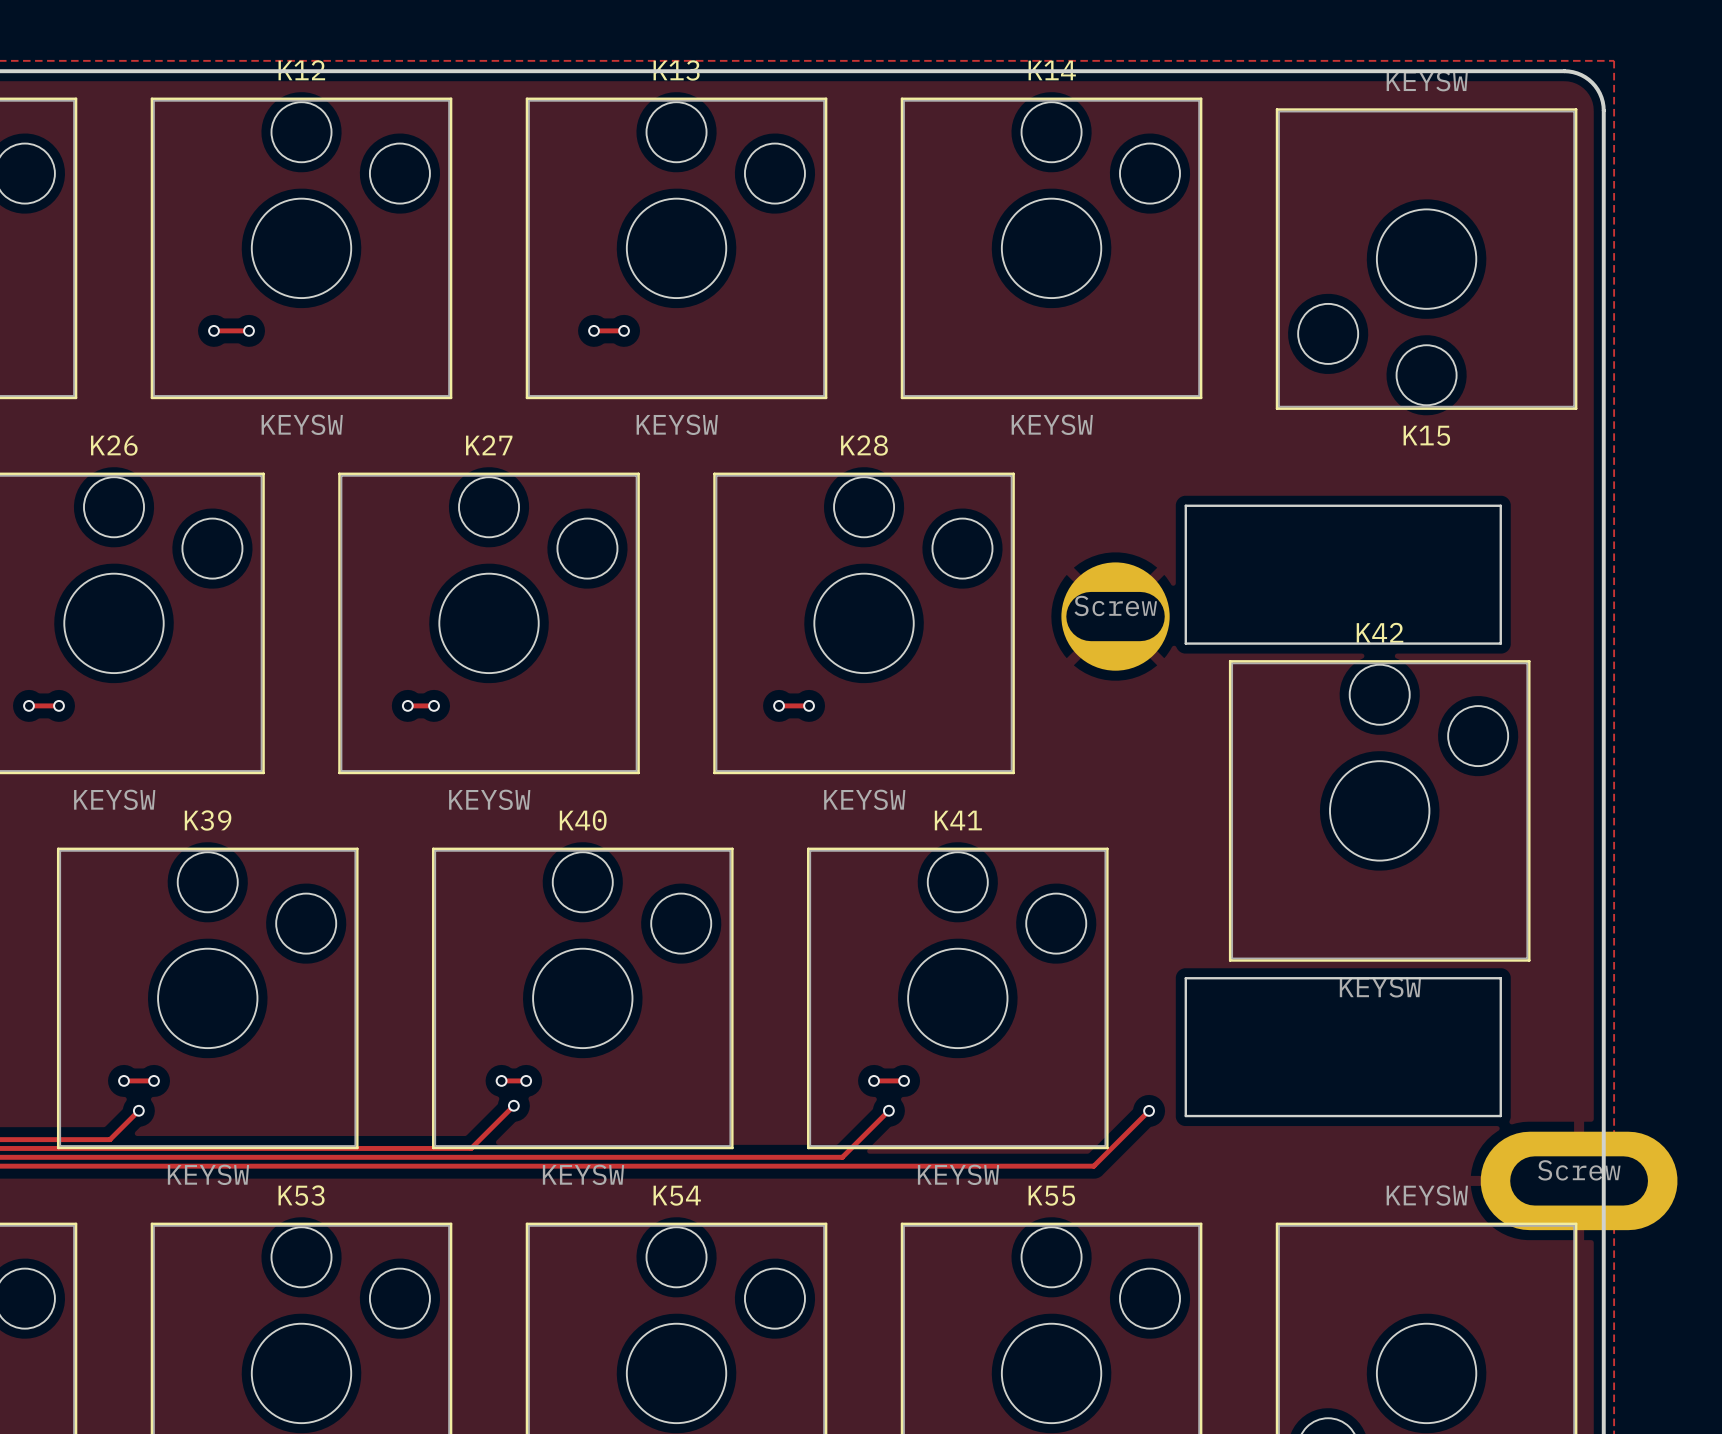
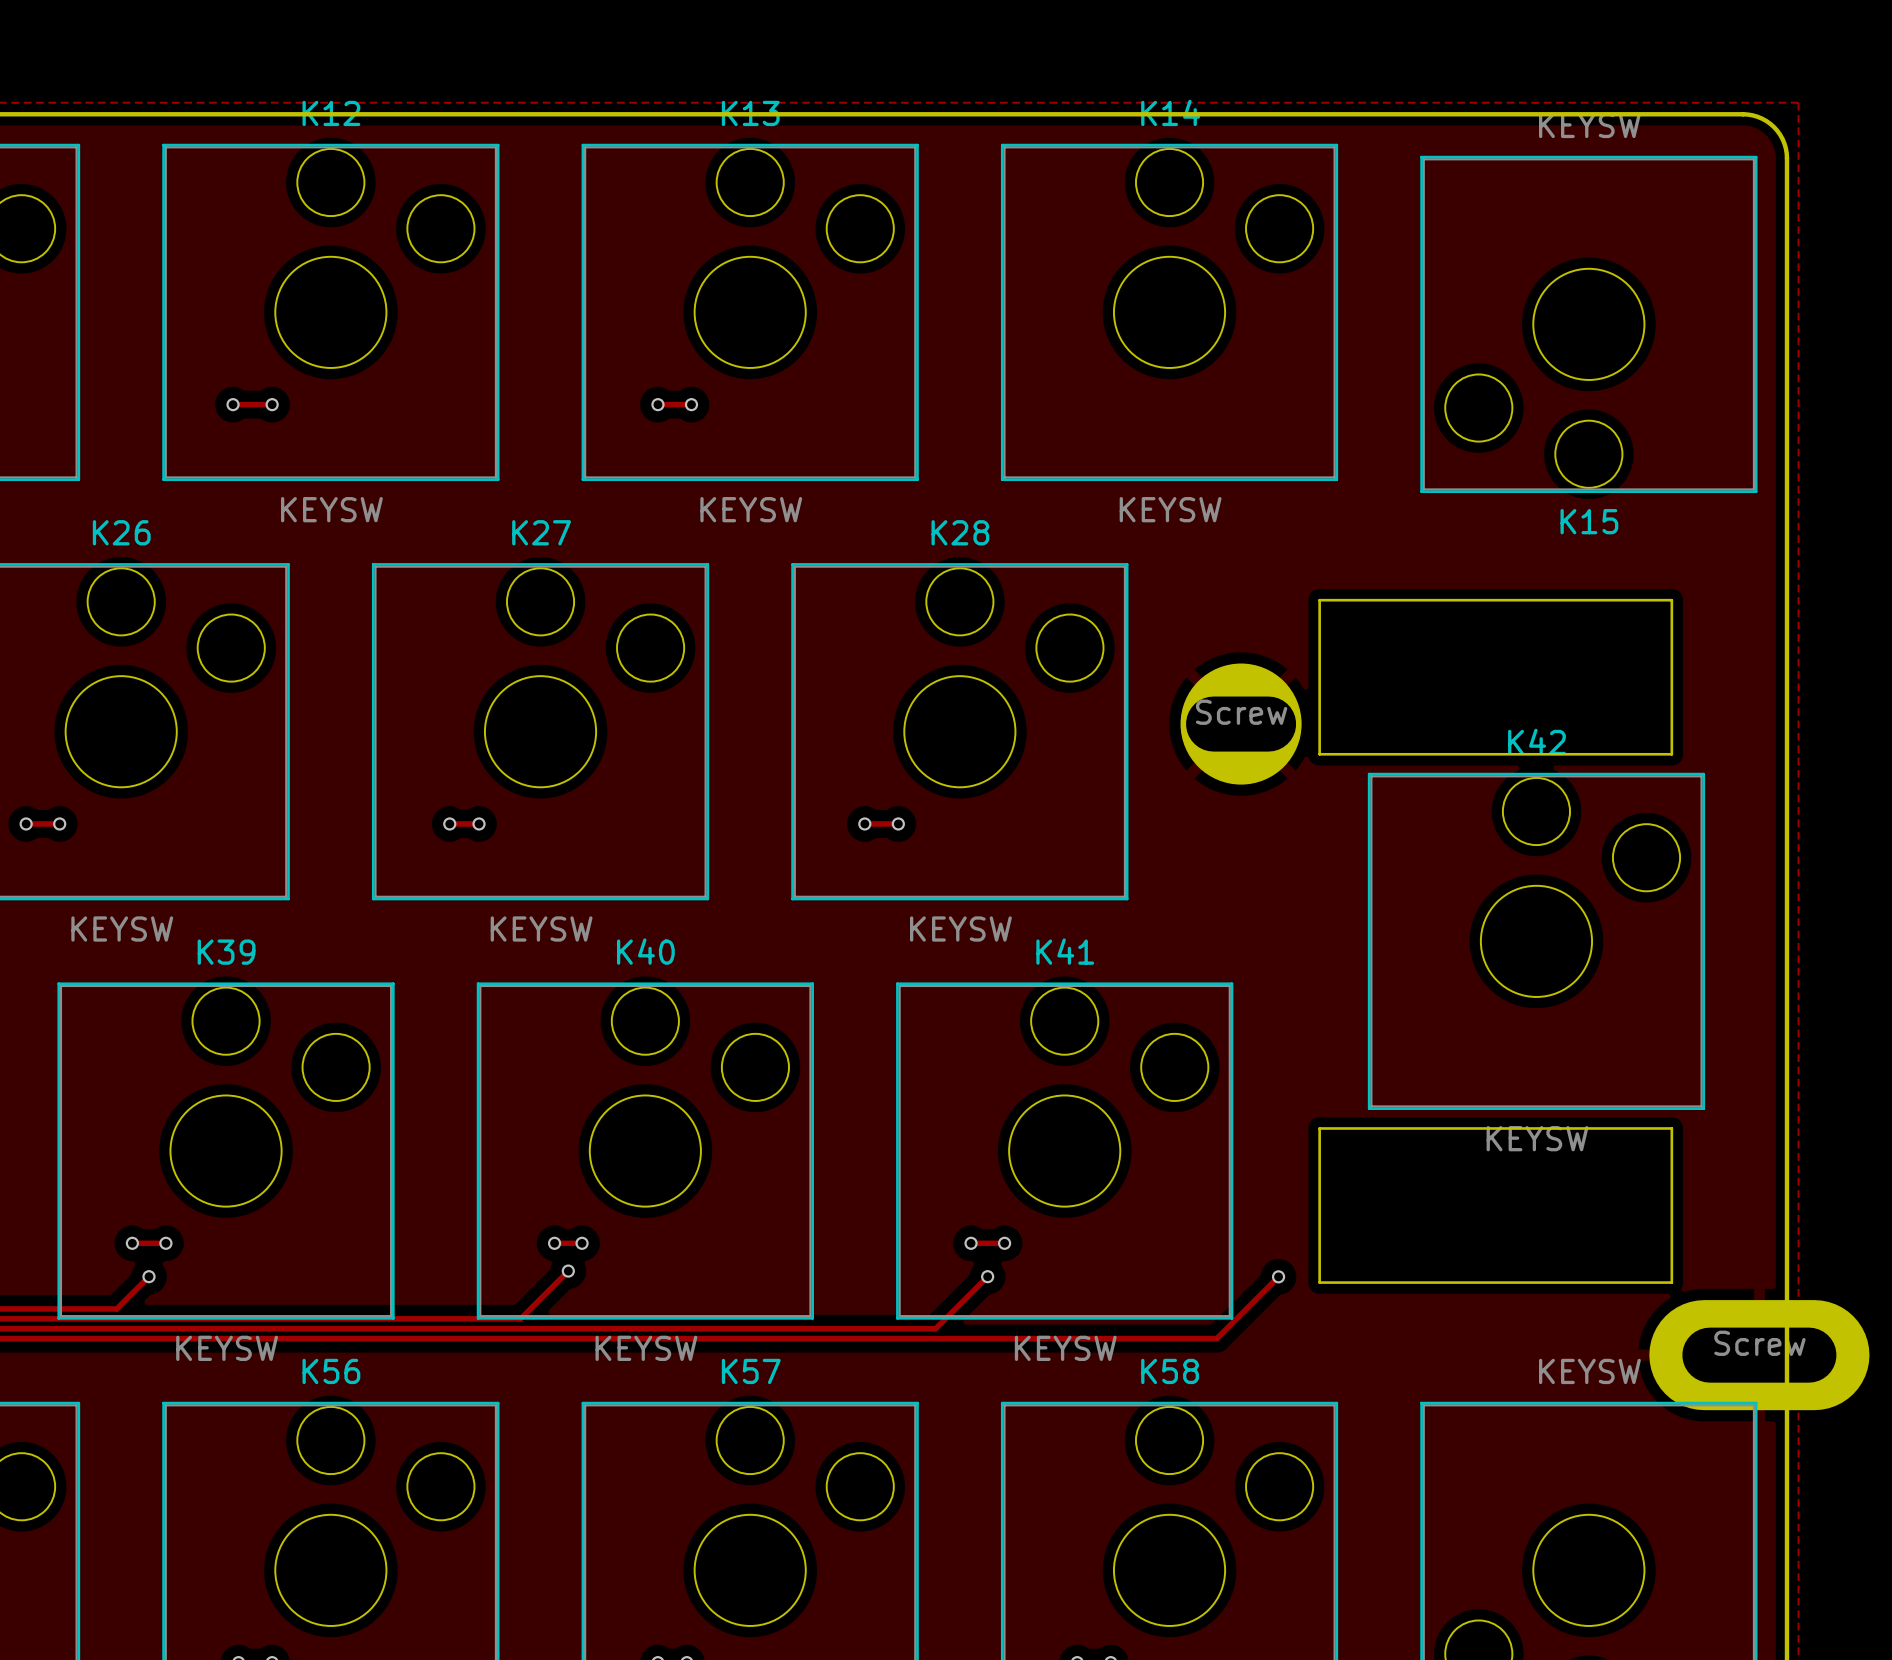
K53 name: K53 (301, 1195) -> K56 (331, 1371)
K54 name: K54 (677, 1195) -> K57 (751, 1371)
K55 name: K55 (1051, 1195) -> K58 (1170, 1371)

